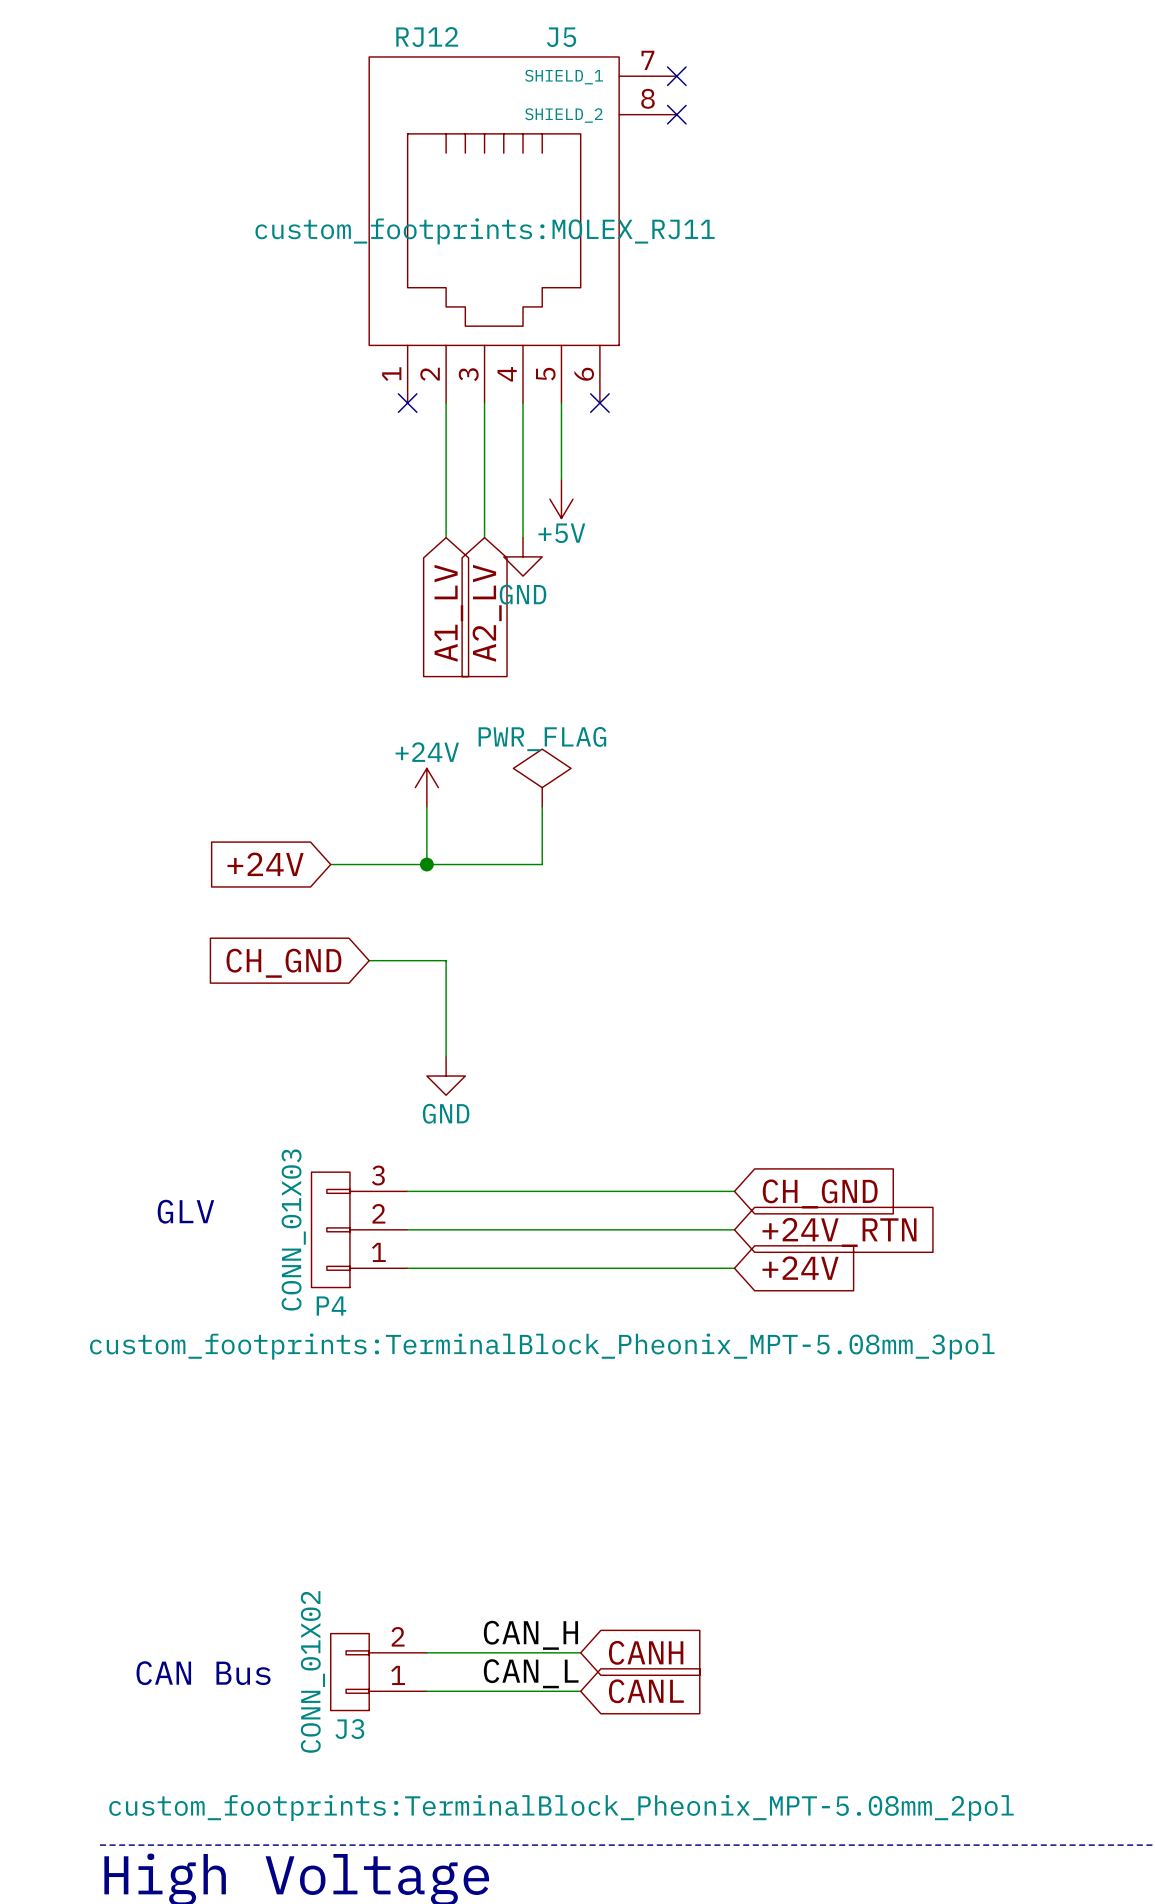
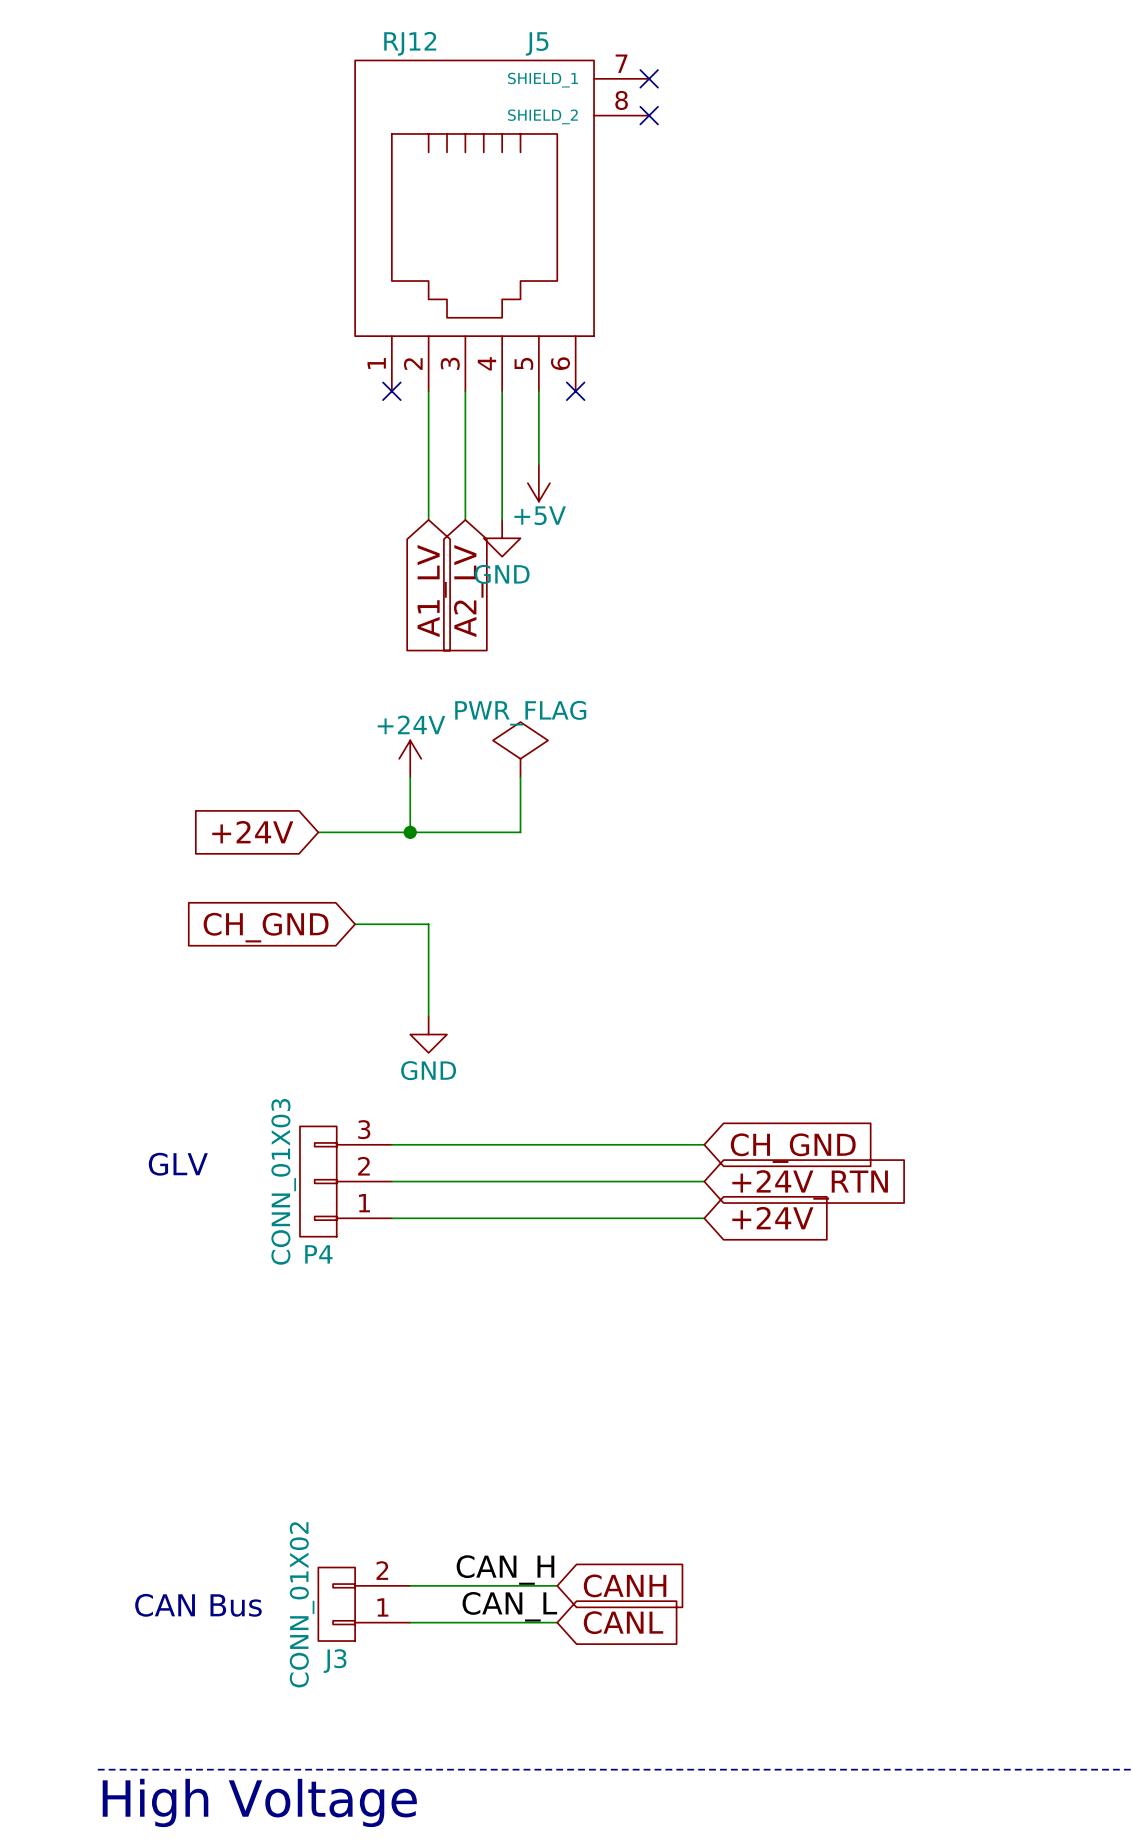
J5 text: custom_footprints:MOLEX_RJ11 (485, 231) -> none
P4 text: custom_footprints:TerminalBlock_Pheonix_MPT-5.08mm_3pol (542, 1346) -> none
J3 text: custom_footprints:TerminalBlock_Pheonix_MPT-5.08mm_2pol (561, 1808) -> none

